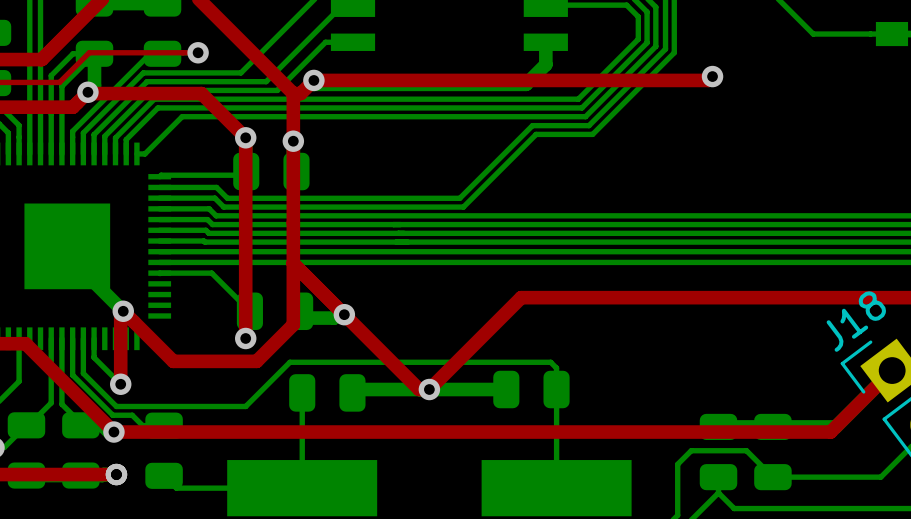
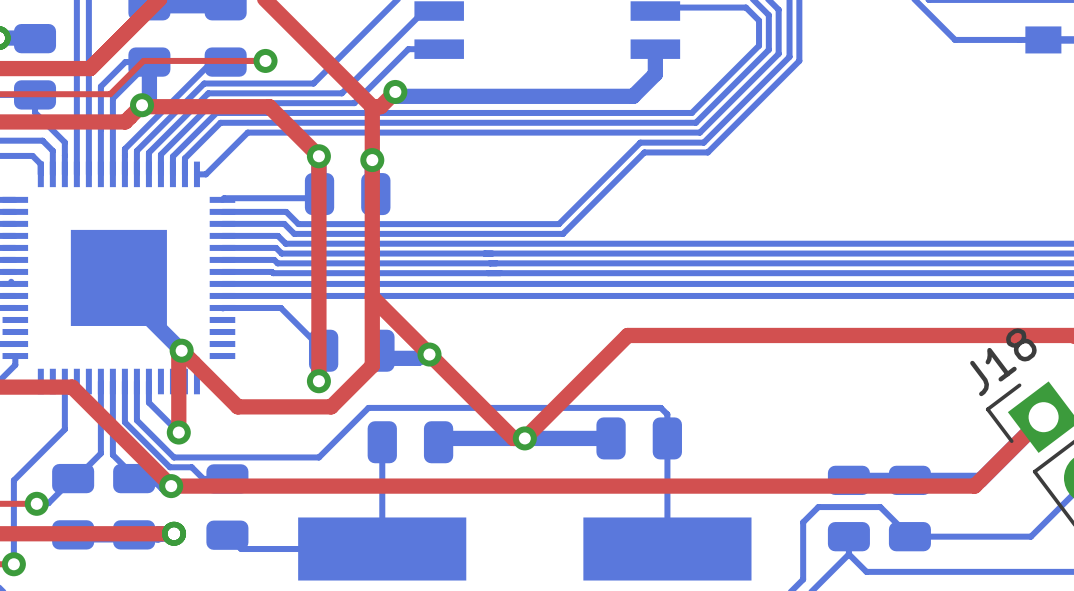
top track: (712, 76) (708, 80) (313, 80) -> none
via: (712, 76) -> none

